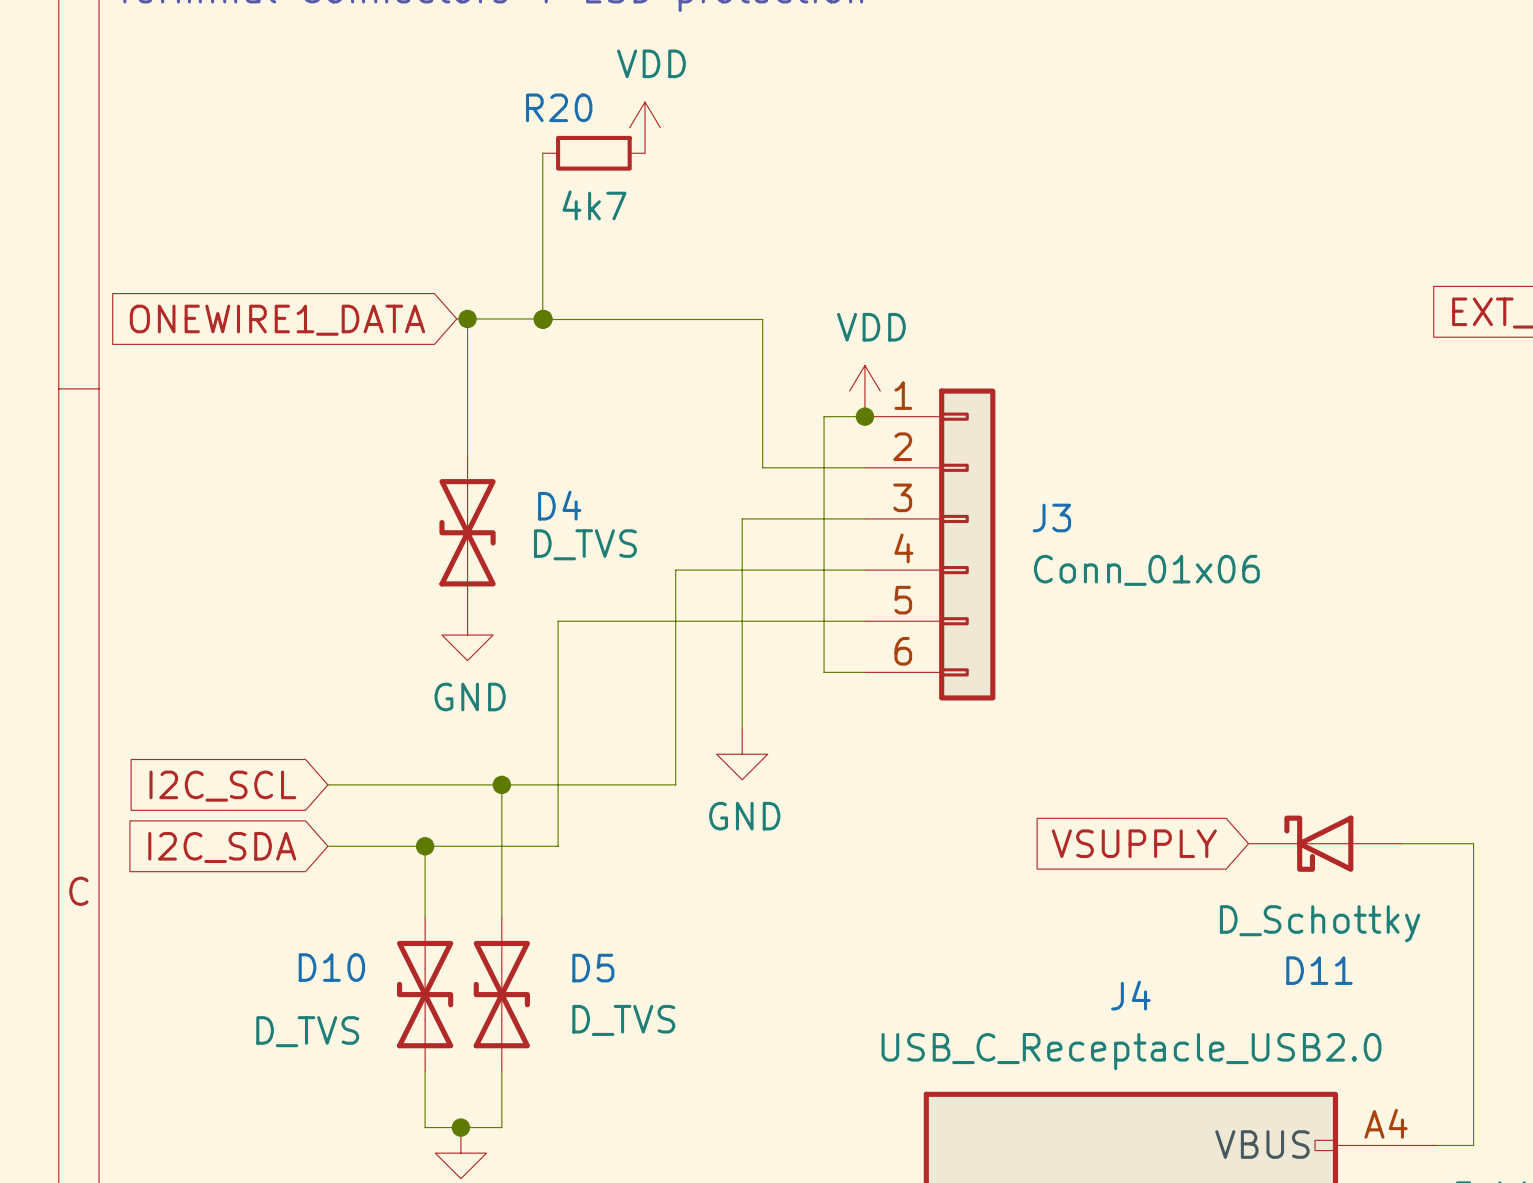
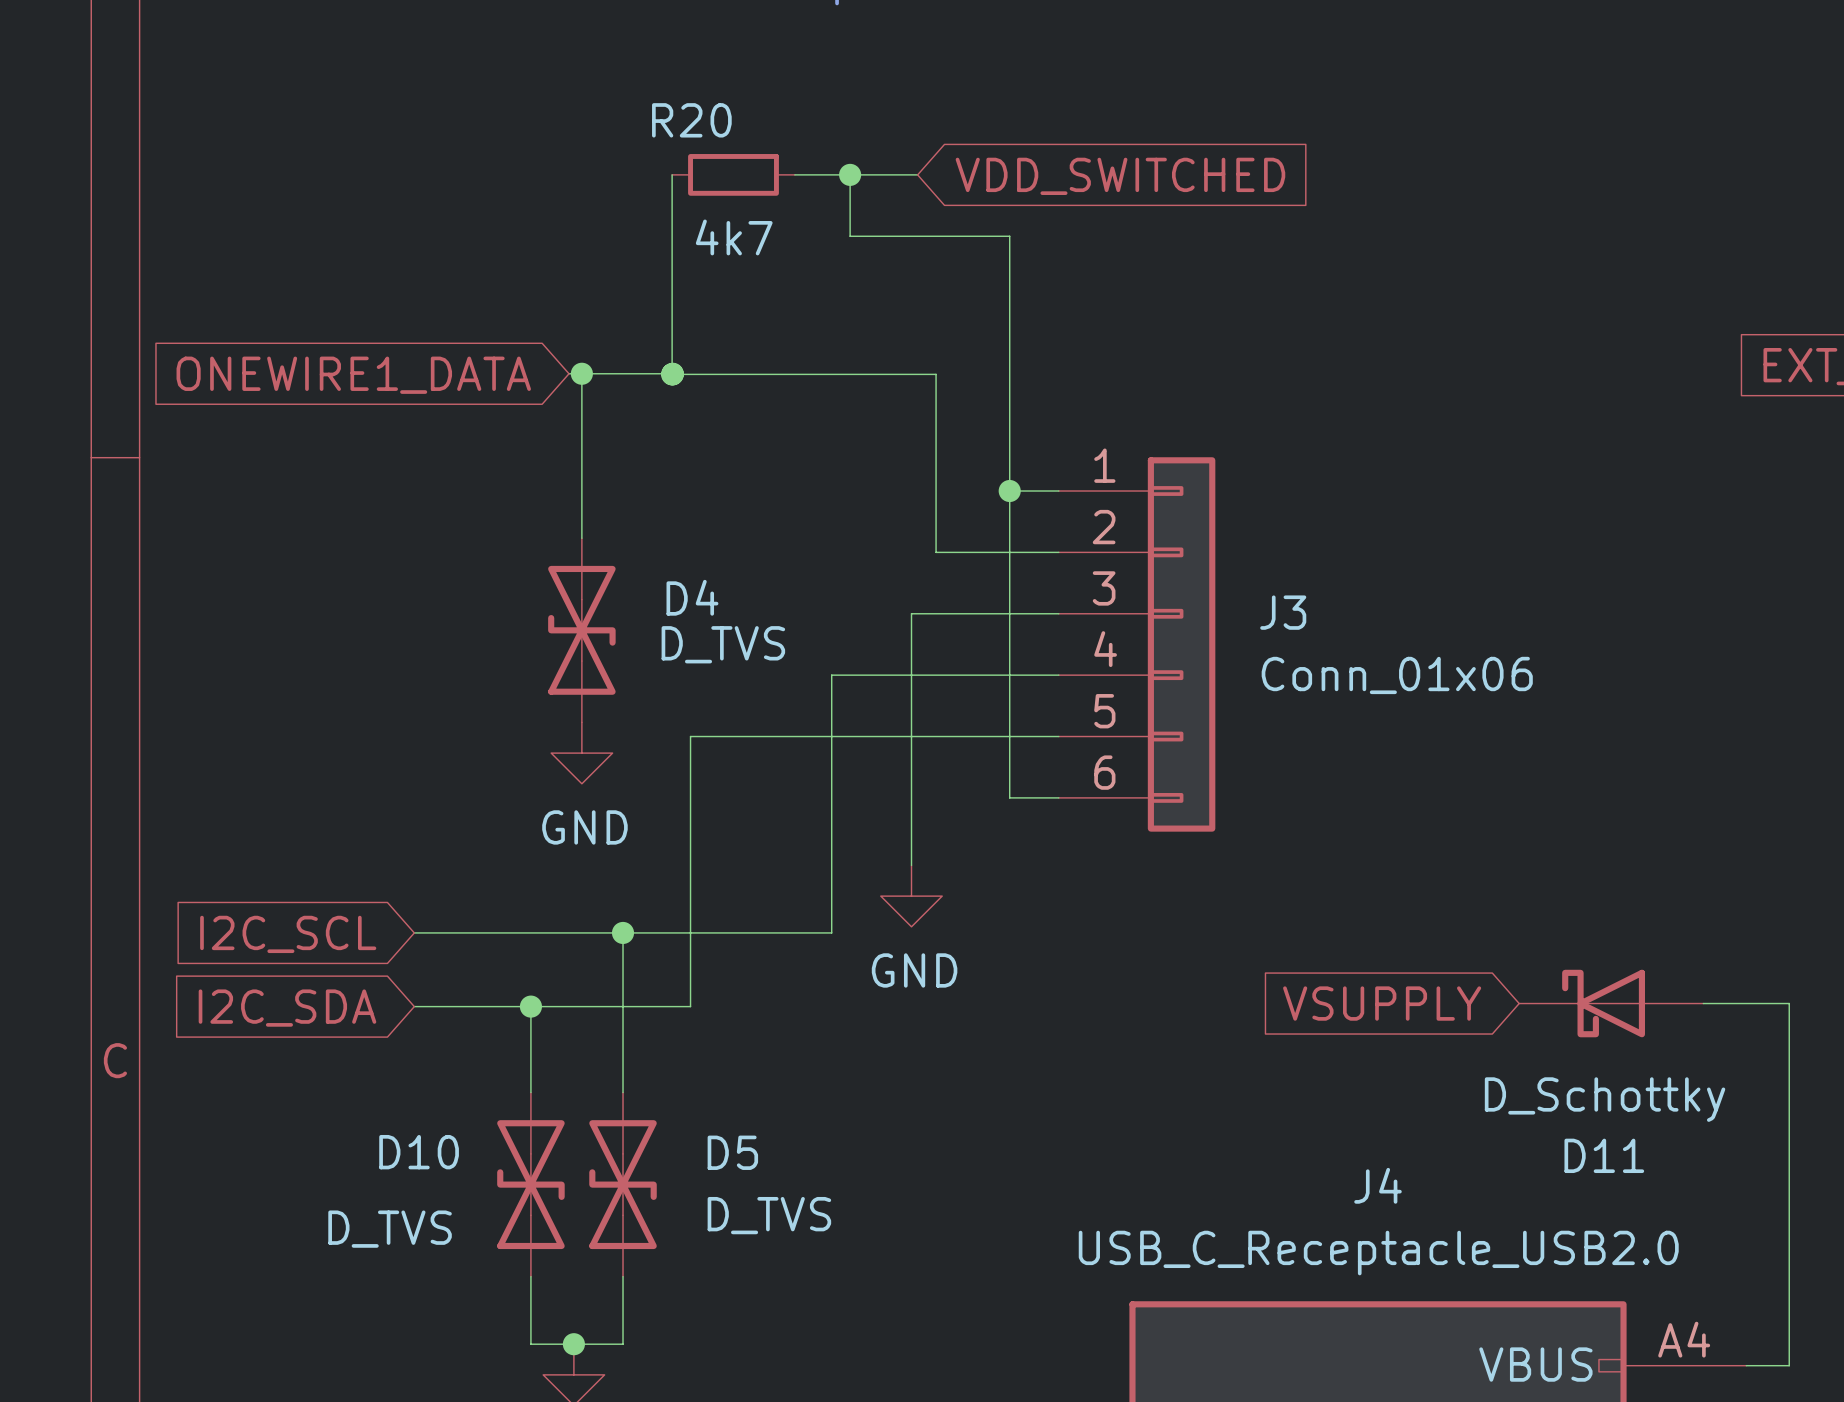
power symbol: VDD (645, 127) -> none
wire: none -> (794, 174) (917, 174)
wire: none -> (850, 174) (850, 236) (1009, 236) (1009, 491)
junction: none -> (850, 174)
global label: none -> VDD_SWITCHED (1120, 176)
power symbol: VDD (864, 391) -> none
junction position: (864, 416) -> (1009, 491)

